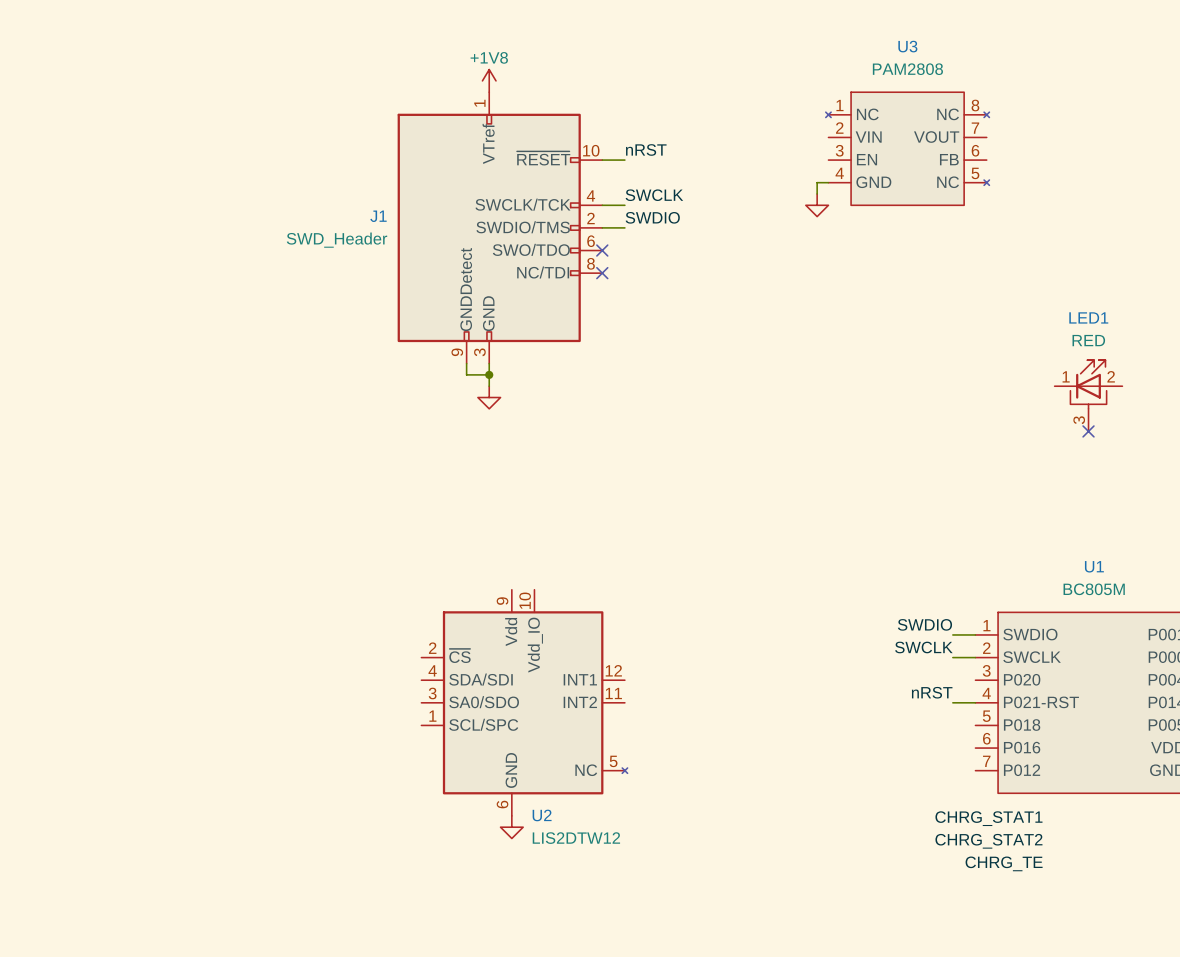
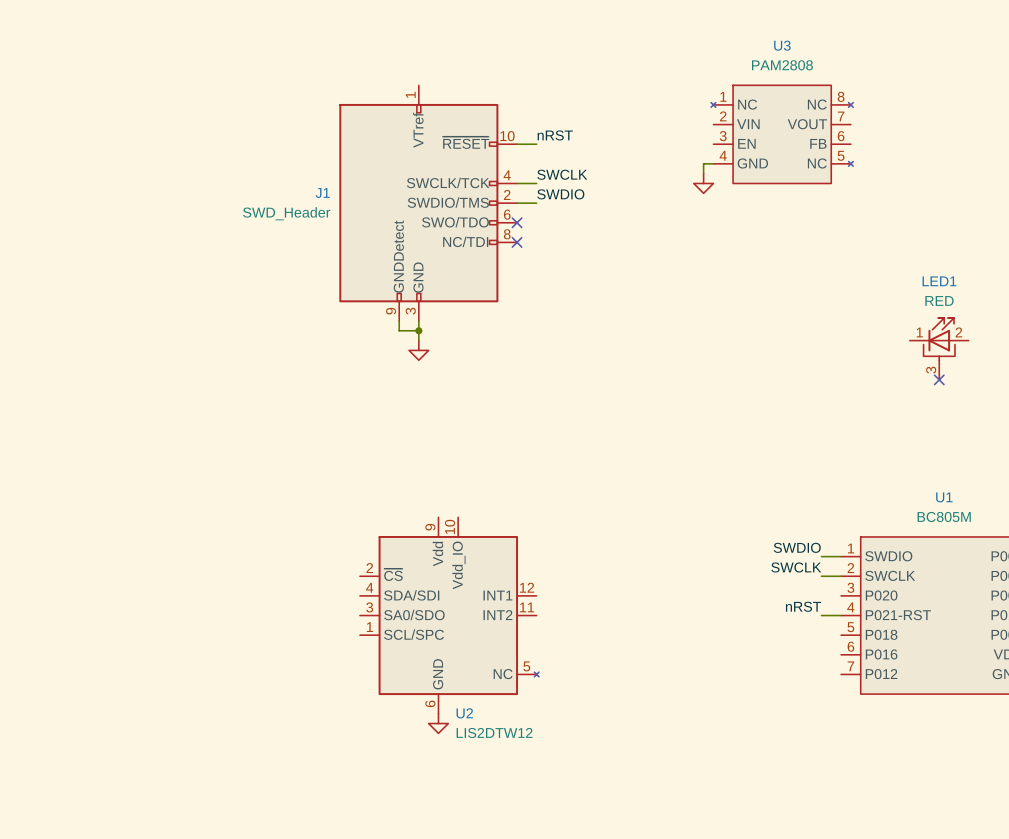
power symbol: +1V8 (489, 80) -> none
label: CHRG_STAT1 (988, 818) -> none
label: CHRG_STAT2 (988, 841) -> none
label: CHRG_TE (1004, 863) -> none

